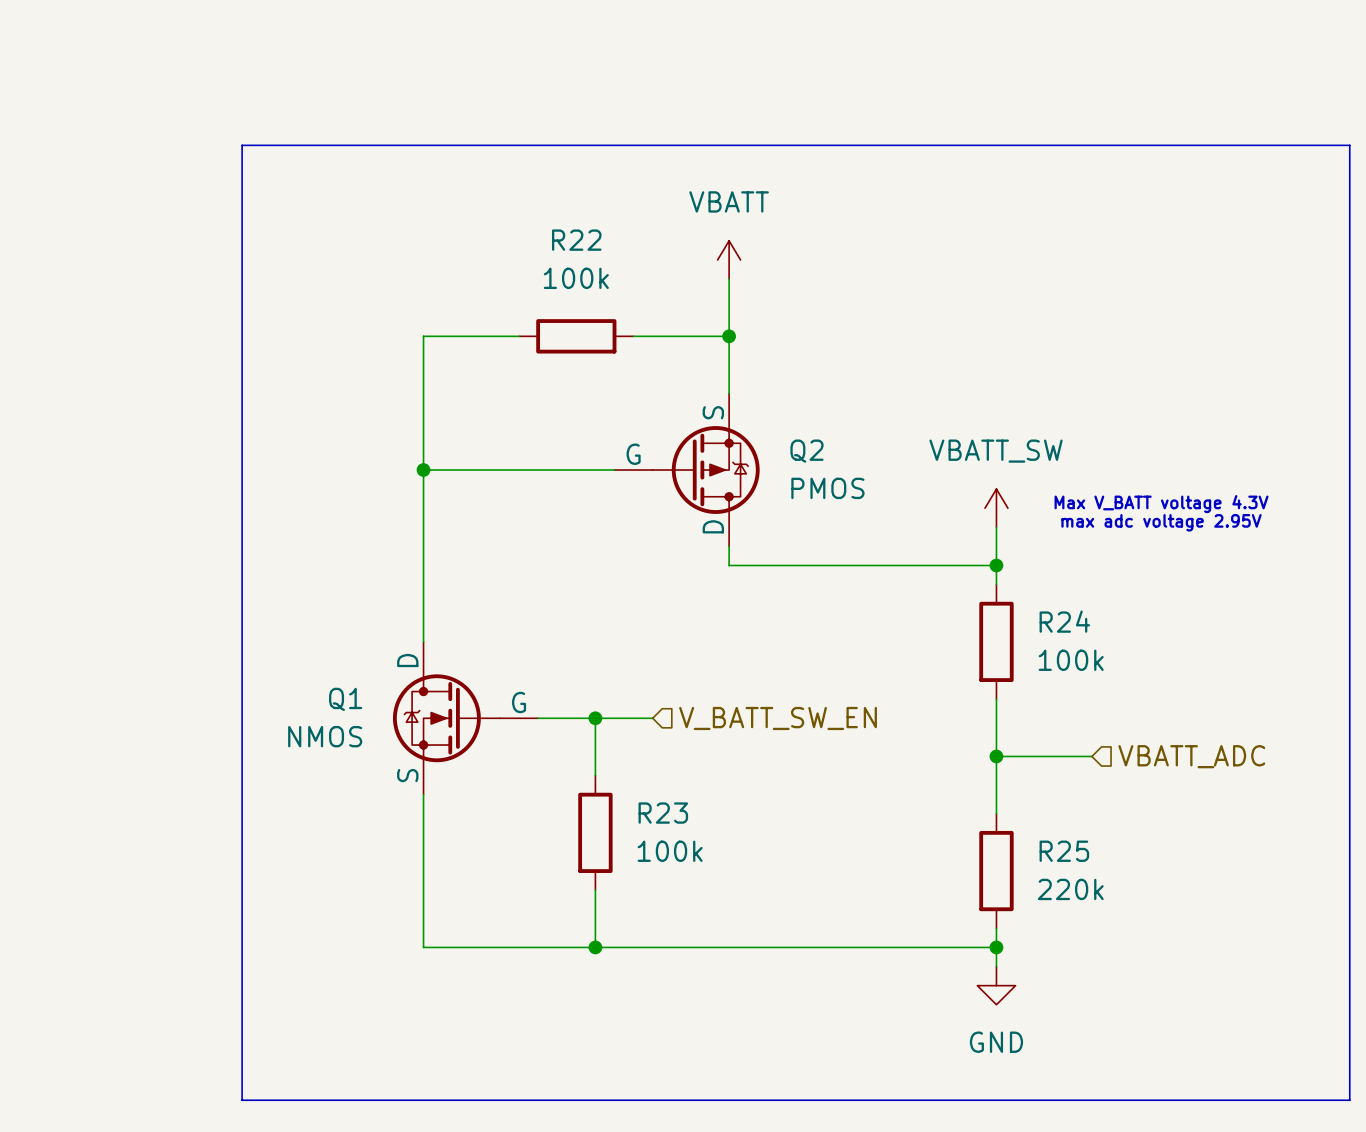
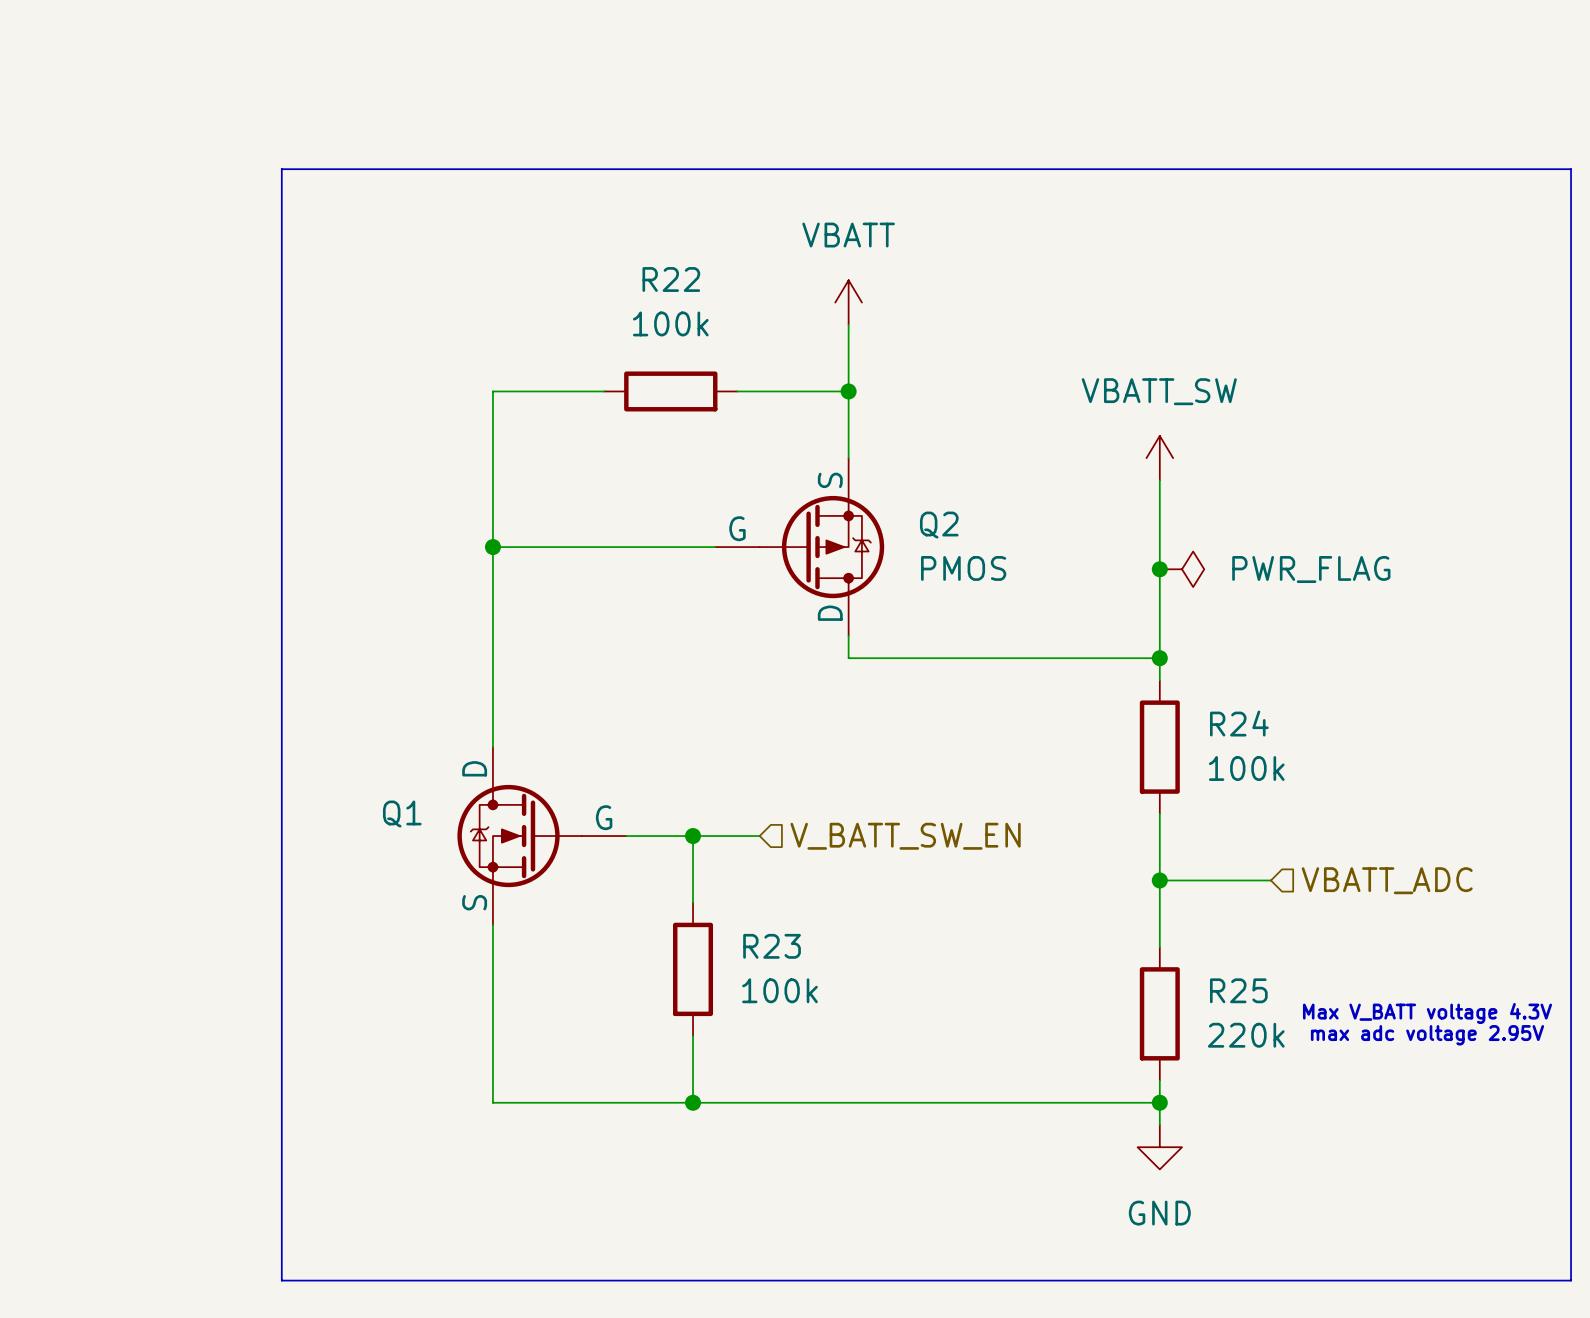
wire: none -> (1159, 480) (1159, 613)
junction: none -> (1159, 569)
power symbol: none -> PWR_FLAG (1182, 569)
text position: Max V_BATT voltage 4.3V (1161, 504) -> Max V_BATT voltage 4.3V (1427, 1013)
power symbol position: VBATT_SW (996, 508) -> VBATT_SW (1159, 458)
text position: max adc voltage 2.95V (1161, 522) -> max adc voltage 2.95V (1427, 1035)
Q1 value: NMOS (325, 736) -> none

